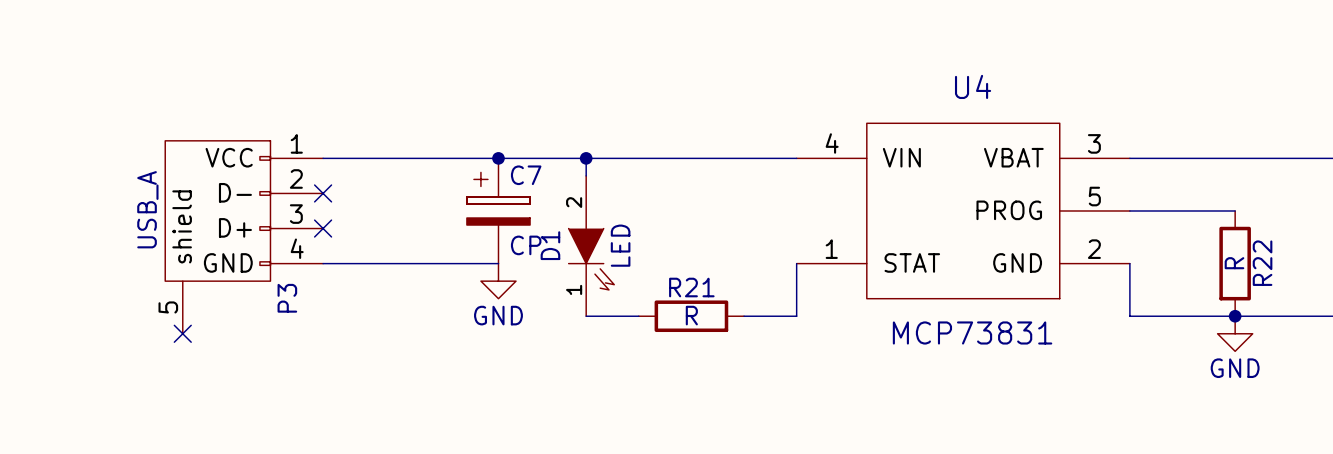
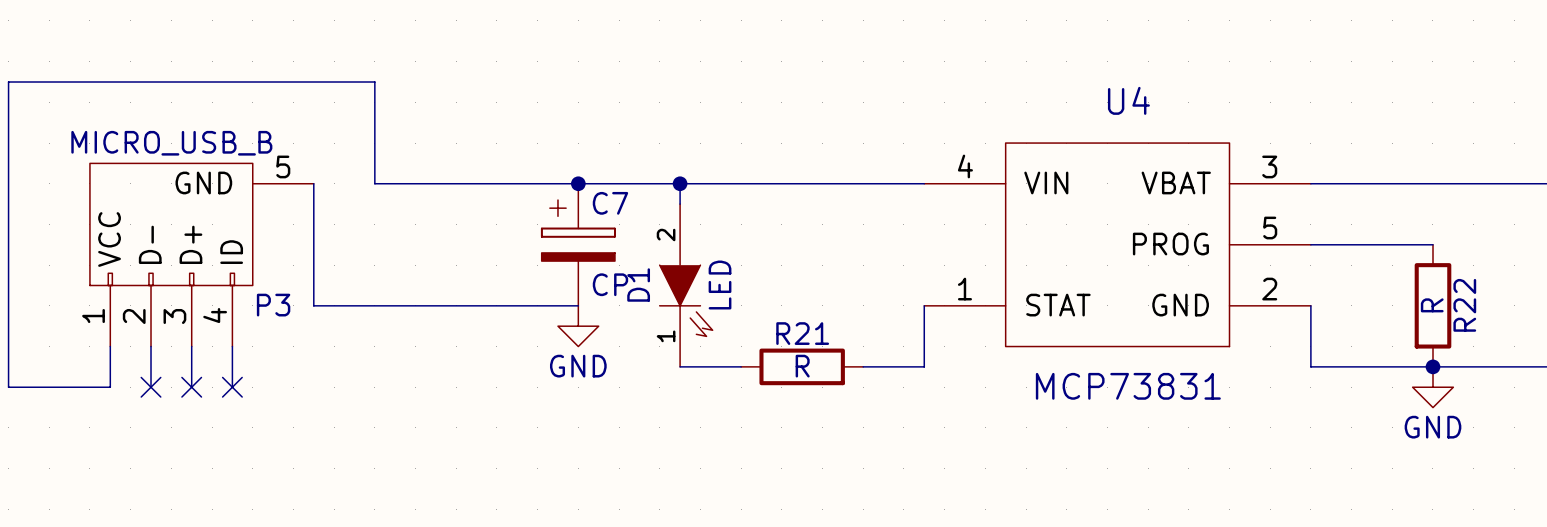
P3 symbol: [165, 140, 324, 334] -> [89, 163, 314, 347]
wire: none -> (374, 183) (374, 82) (8, 82) (8, 387) (110, 387) (110, 346)
no-connect mark: (323, 193) -> none
P3 value: USB_A (147, 209) -> MICRO_USB_B (171, 143)
no-connect mark: (323, 228) -> none
wire: none -> (151, 346) (151, 387)
wire: none -> (191, 346) (191, 387)
wire: none -> (232, 346) (232, 387)
no-connect mark: none -> (151, 387)
no-connect mark: none -> (191, 387)
no-connect mark: (182, 333) -> none
no-connect mark: none -> (232, 387)

